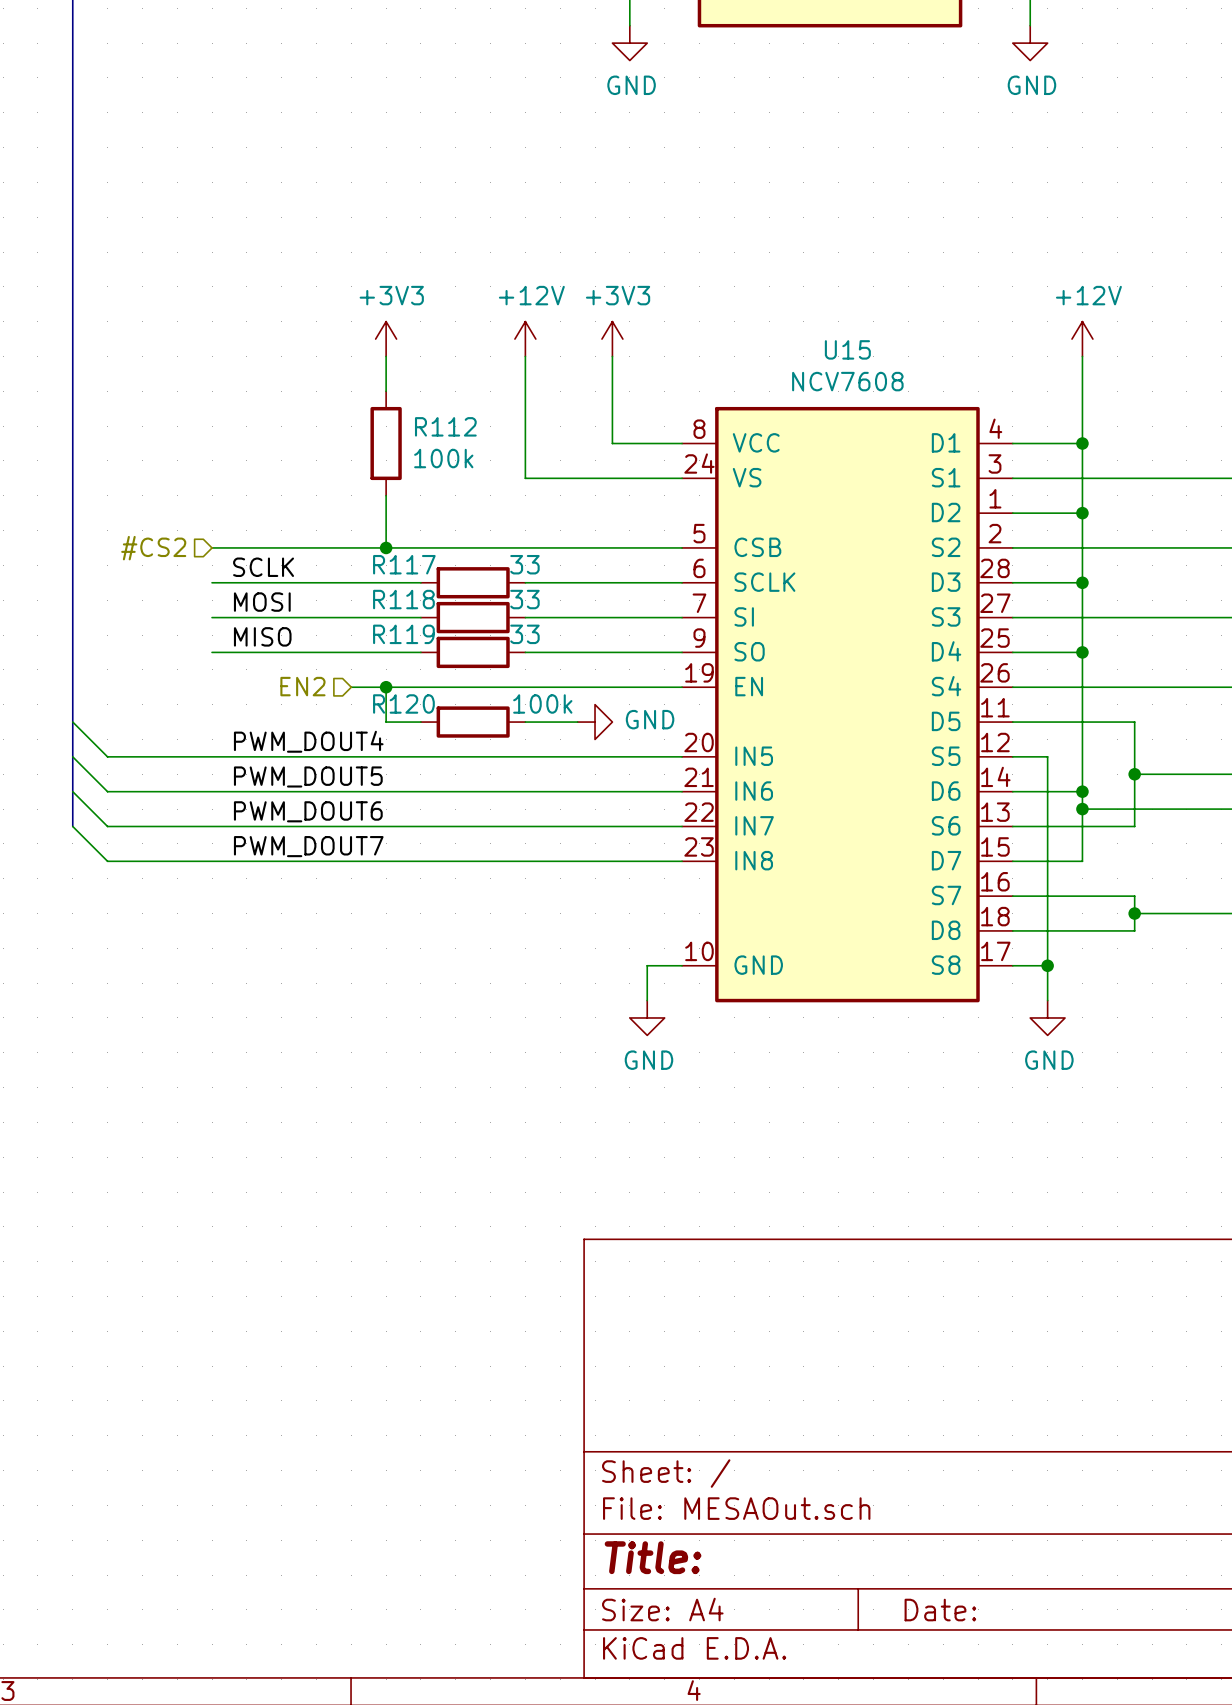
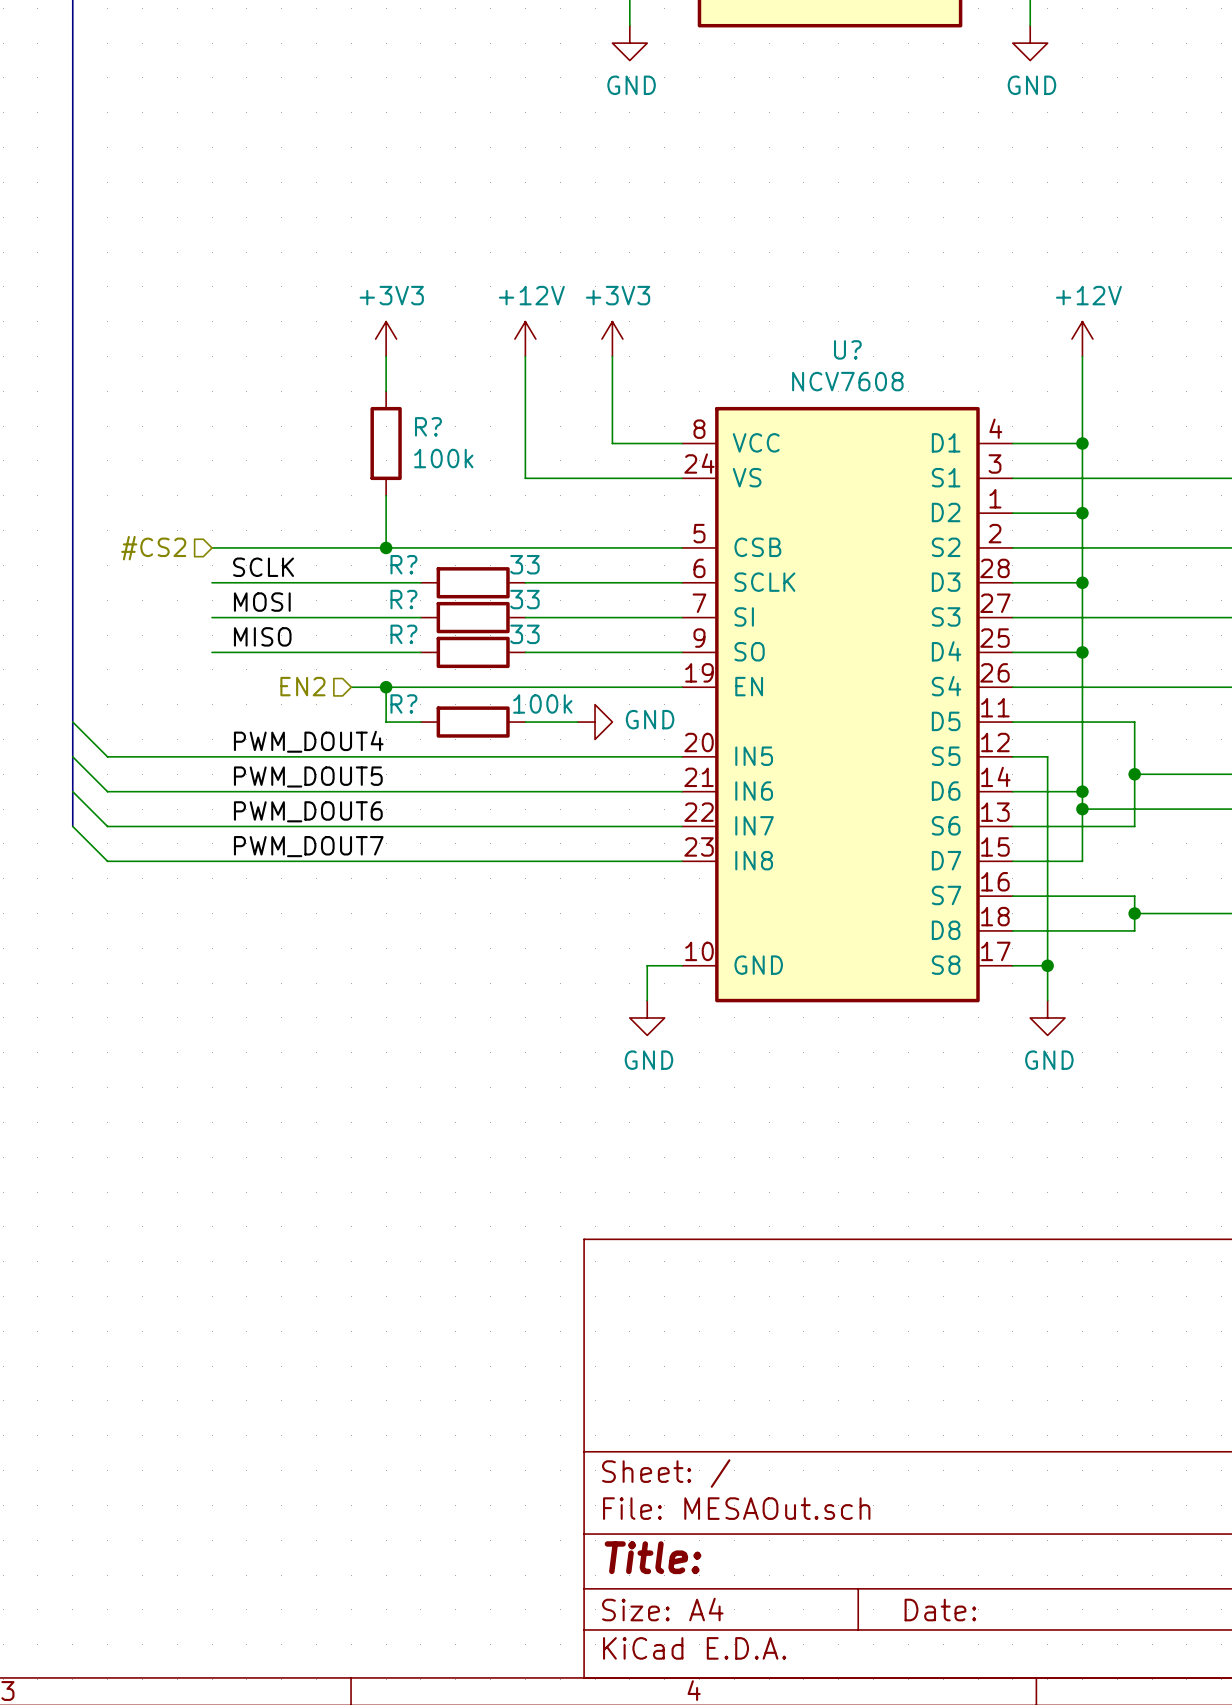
U15 name: U15 (847, 349) -> U? (847, 349)
R112 name: R112 (445, 426) -> R? (428, 426)
R117 name: R117 (404, 564) -> R? (403, 564)
R118 name: R118 (403, 599) -> R? (403, 599)
R119 name: R119 (403, 634) -> R? (403, 634)
R120 name: R120 (403, 703) -> R? (403, 703)

